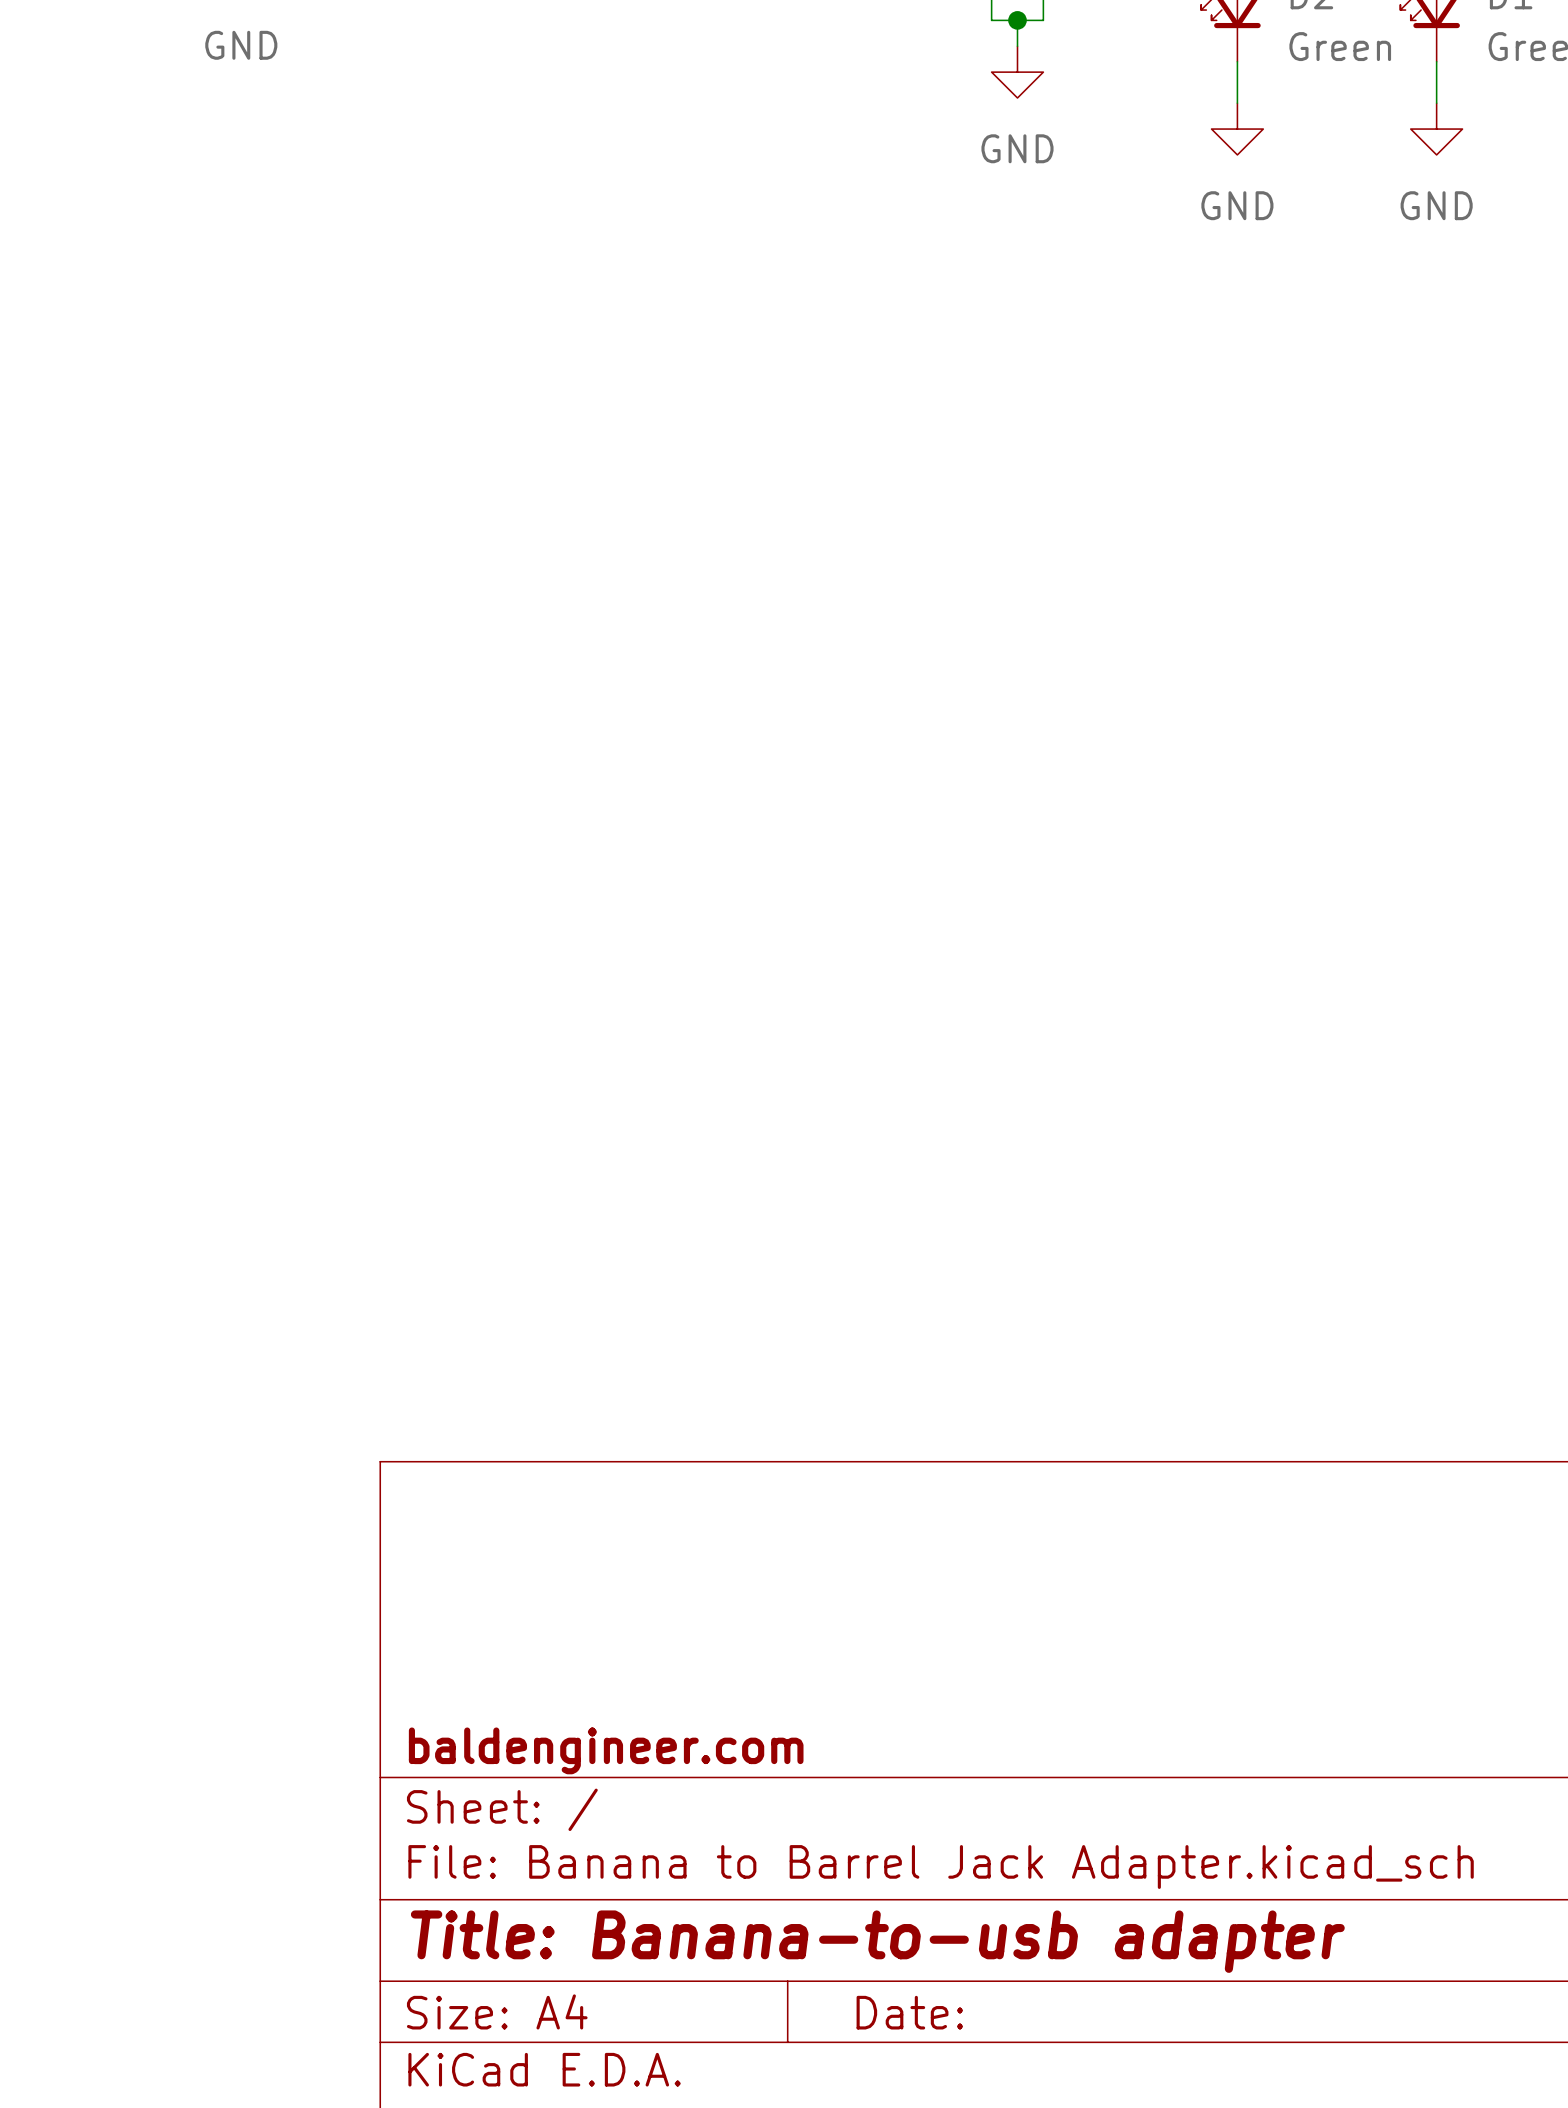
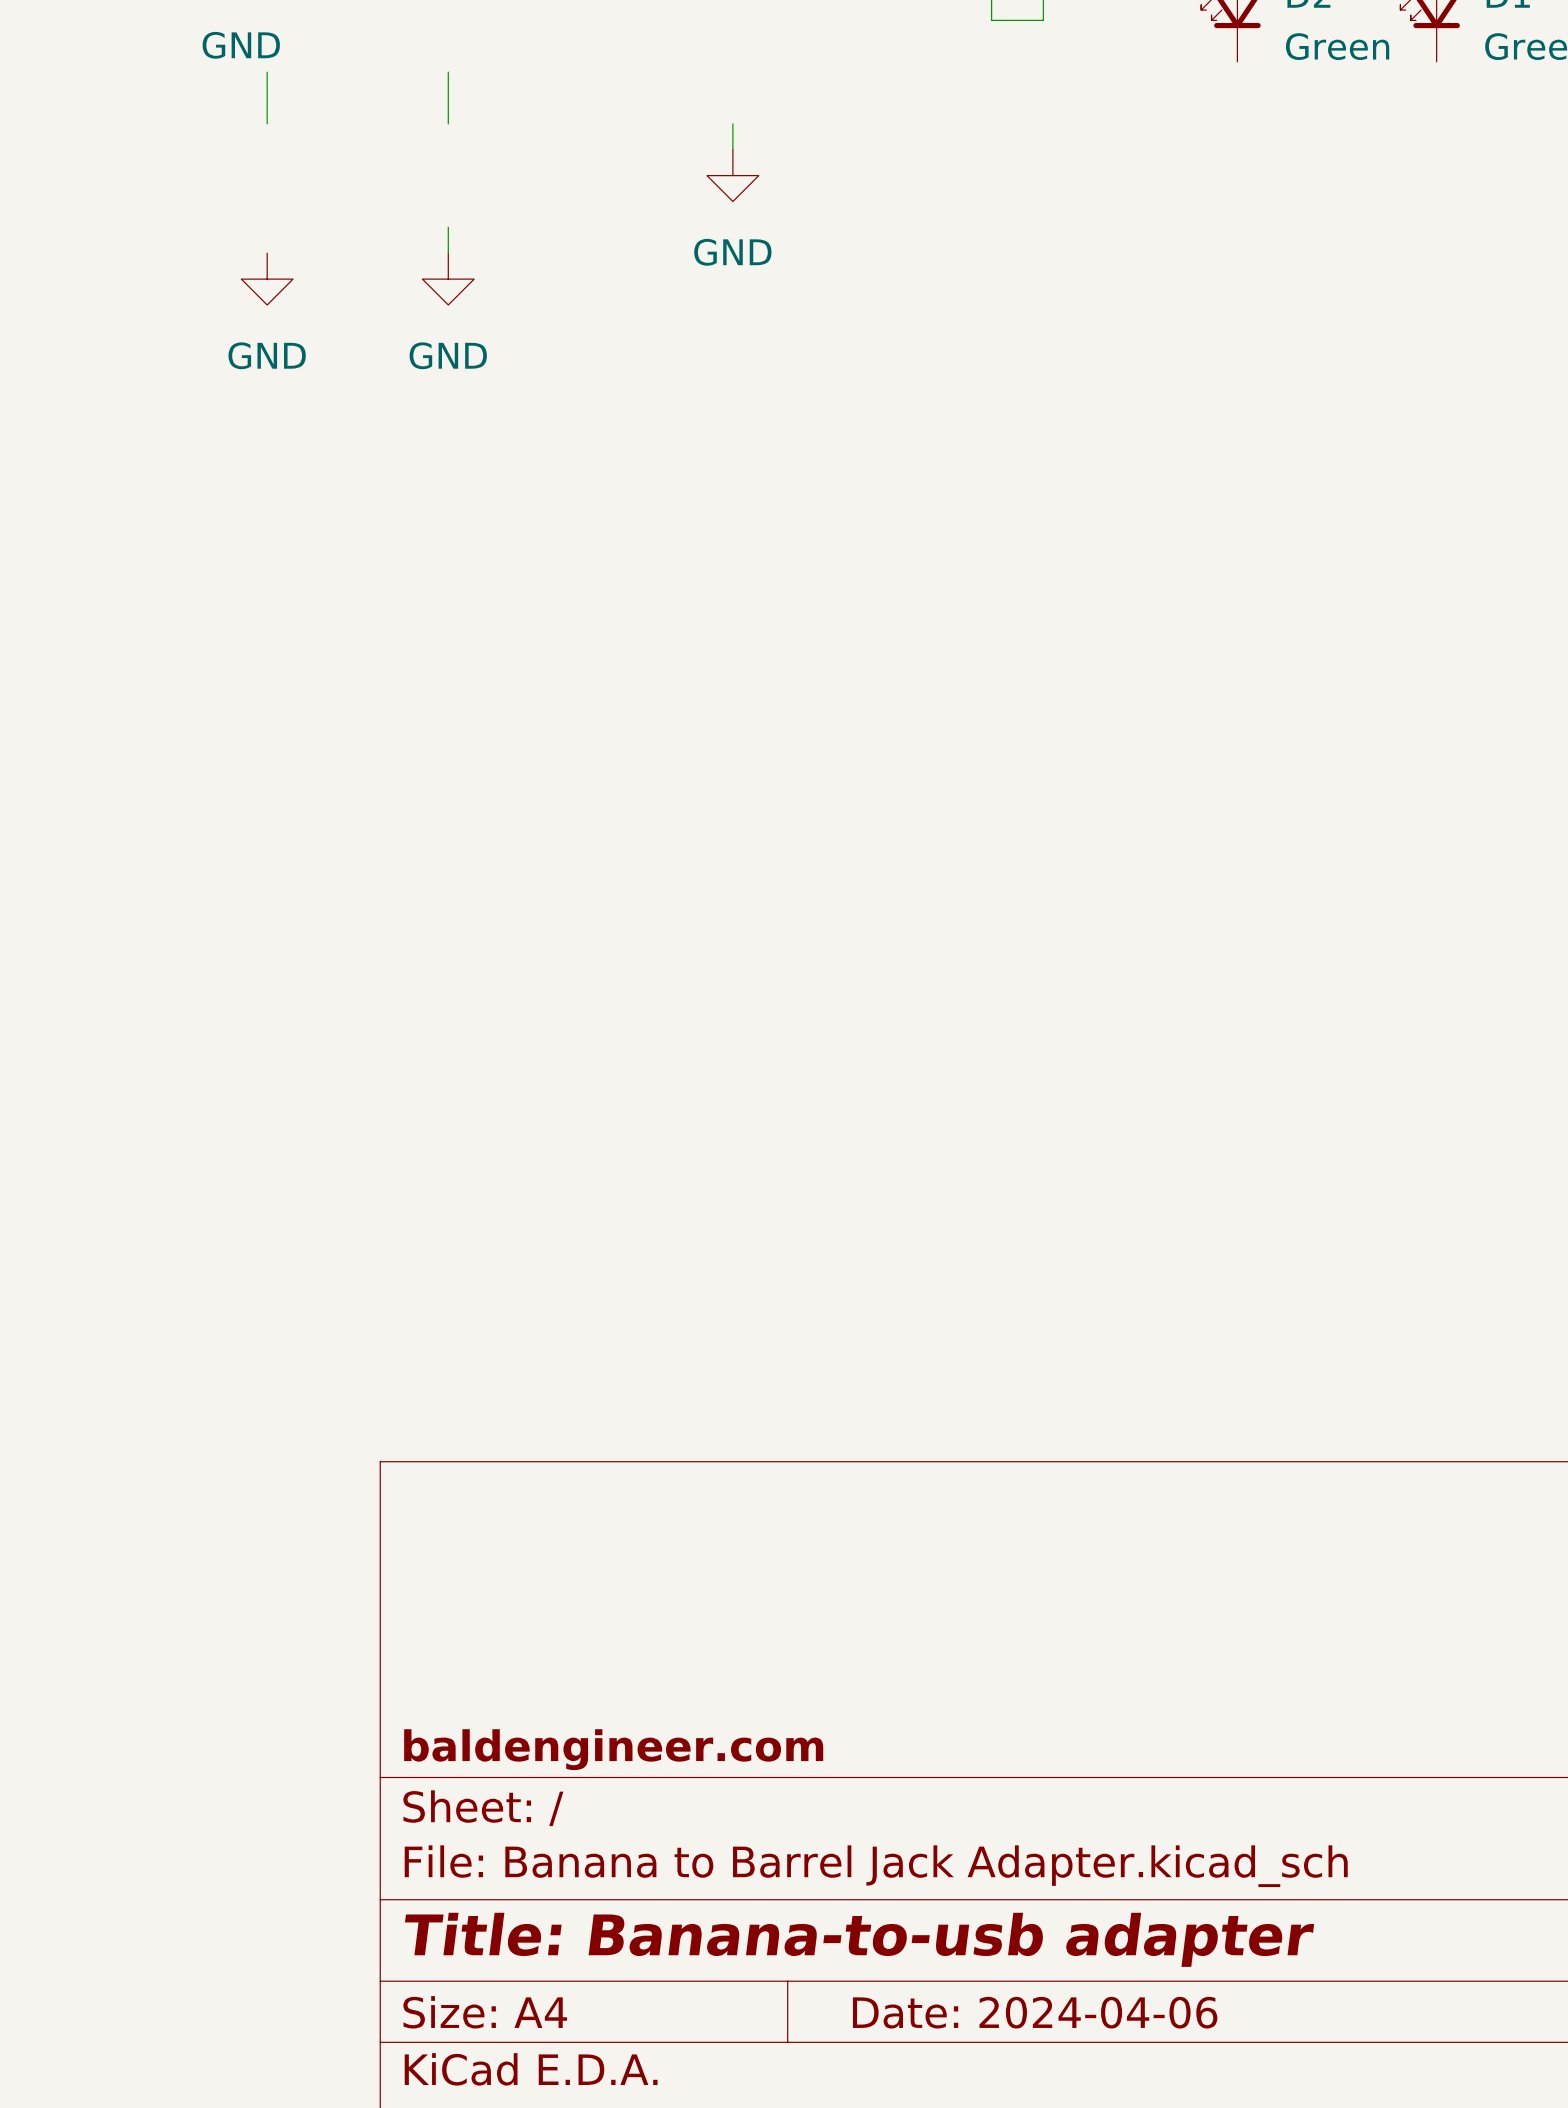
wire: (1017, 20) (1017, 46) -> (732, 123) (732, 149)
junction: (1017, 20) -> none
wire: (1237, 61) (1237, 103) -> none
wire: (1436, 61) (1436, 103) -> none
wire: none -> (267, 72) (267, 123)
wire: none -> (448, 72) (448, 123)
power symbol: GND (1017, 72) -> none
power symbol: GND (1237, 129) -> none
power symbol: GND (1436, 129) -> none
power symbol: none -> GND (732, 175)
wire: none -> (448, 227) (448, 253)
power symbol: none -> GND (267, 279)
power symbol: none -> GND (448, 279)
title block: Date: (909, 2012) -> Date: 2024-04-06 (1035, 2012)

